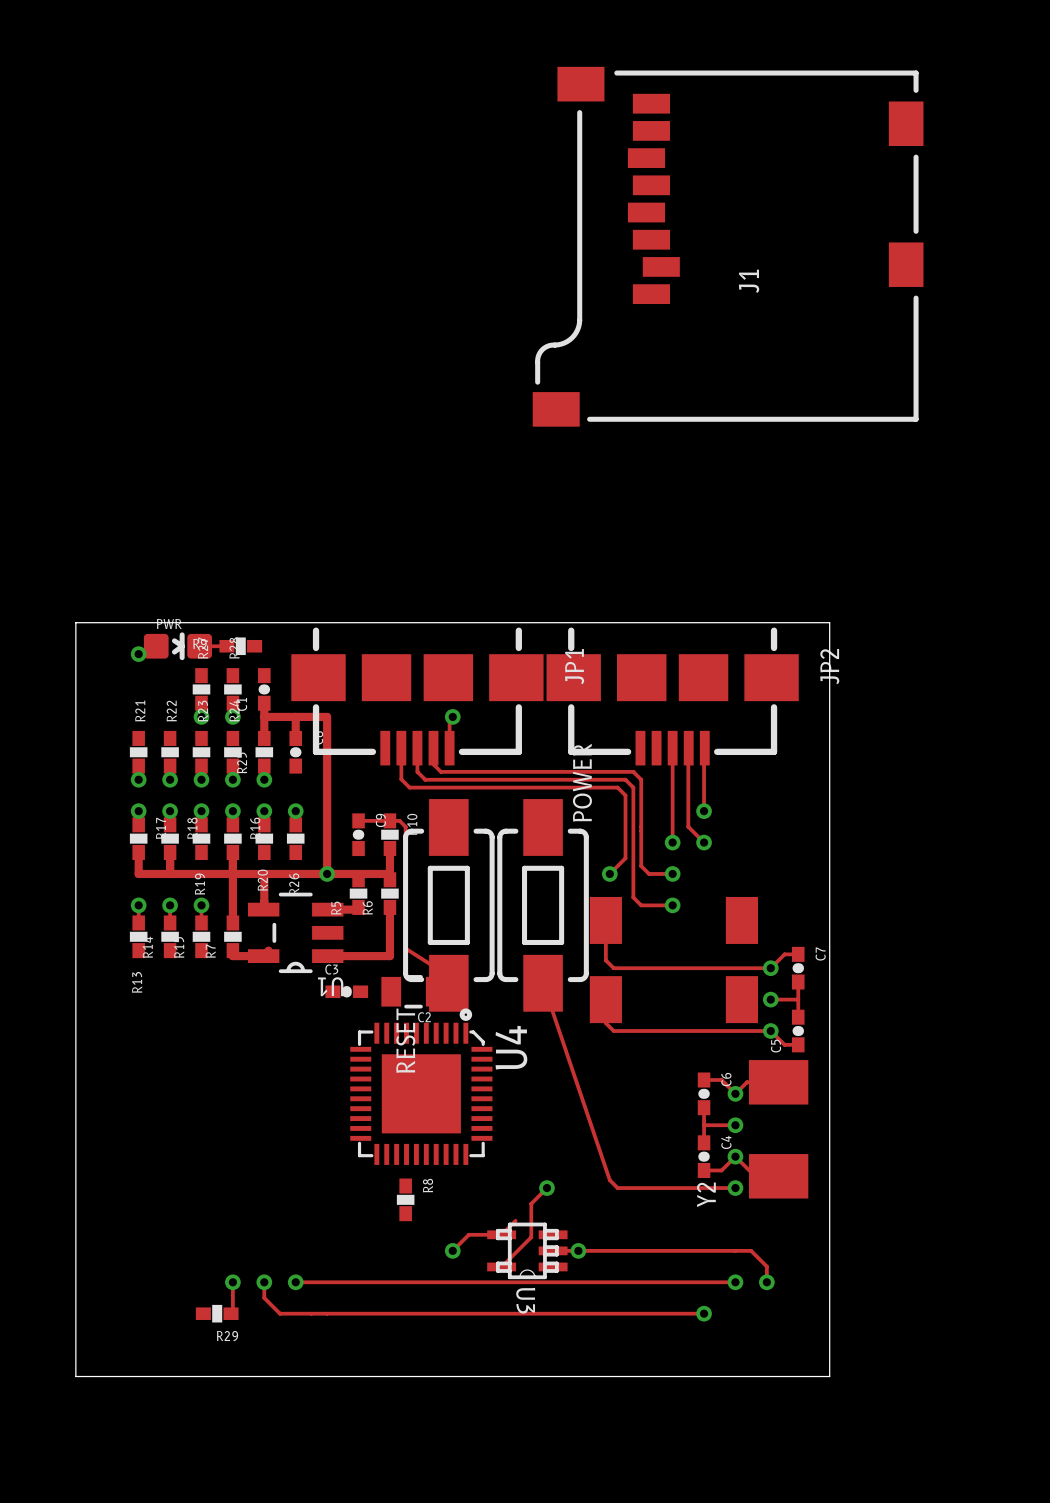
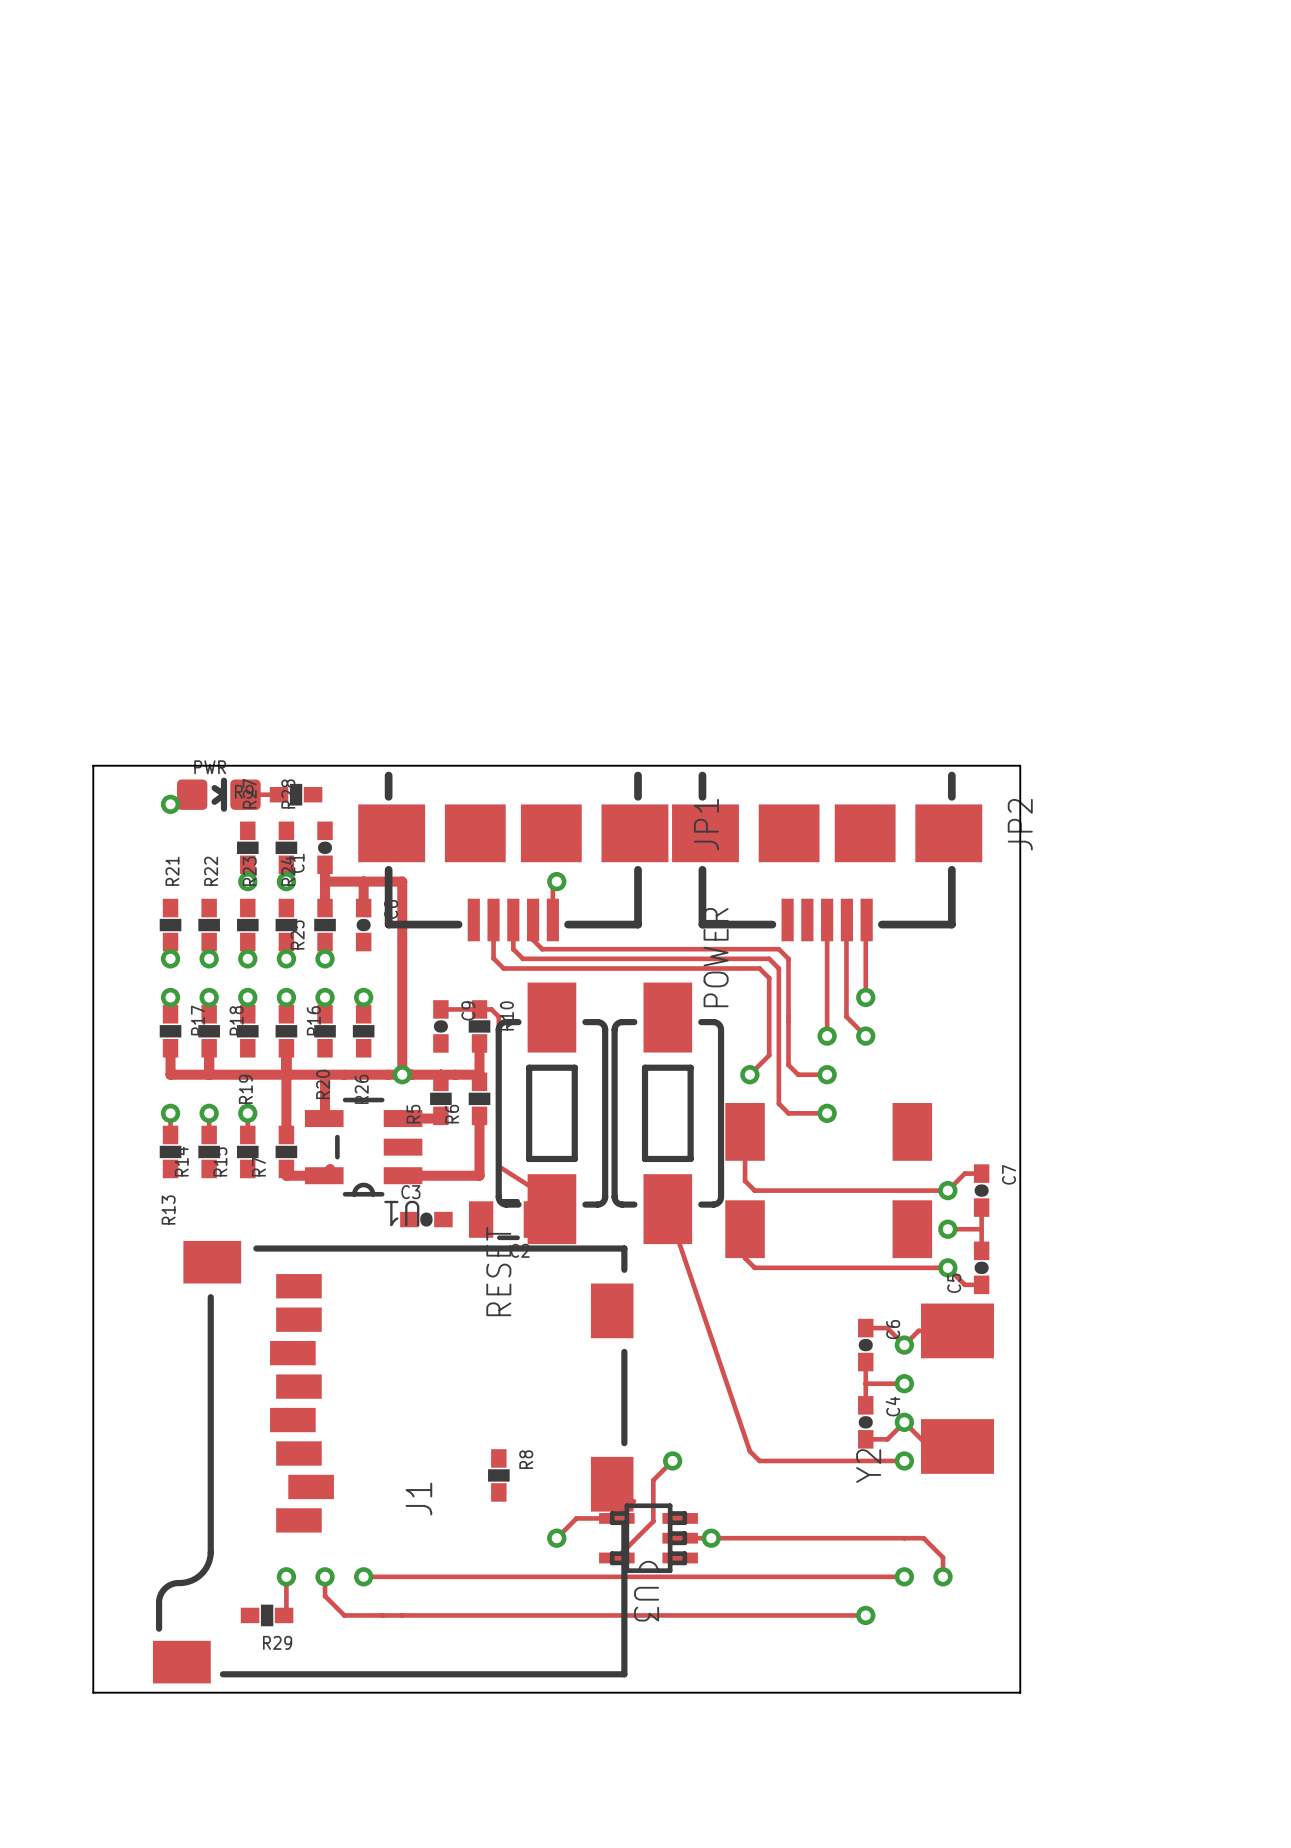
J1 position: (728, 246) -> (393, 1462)
U4: (421, 1086) -> none

